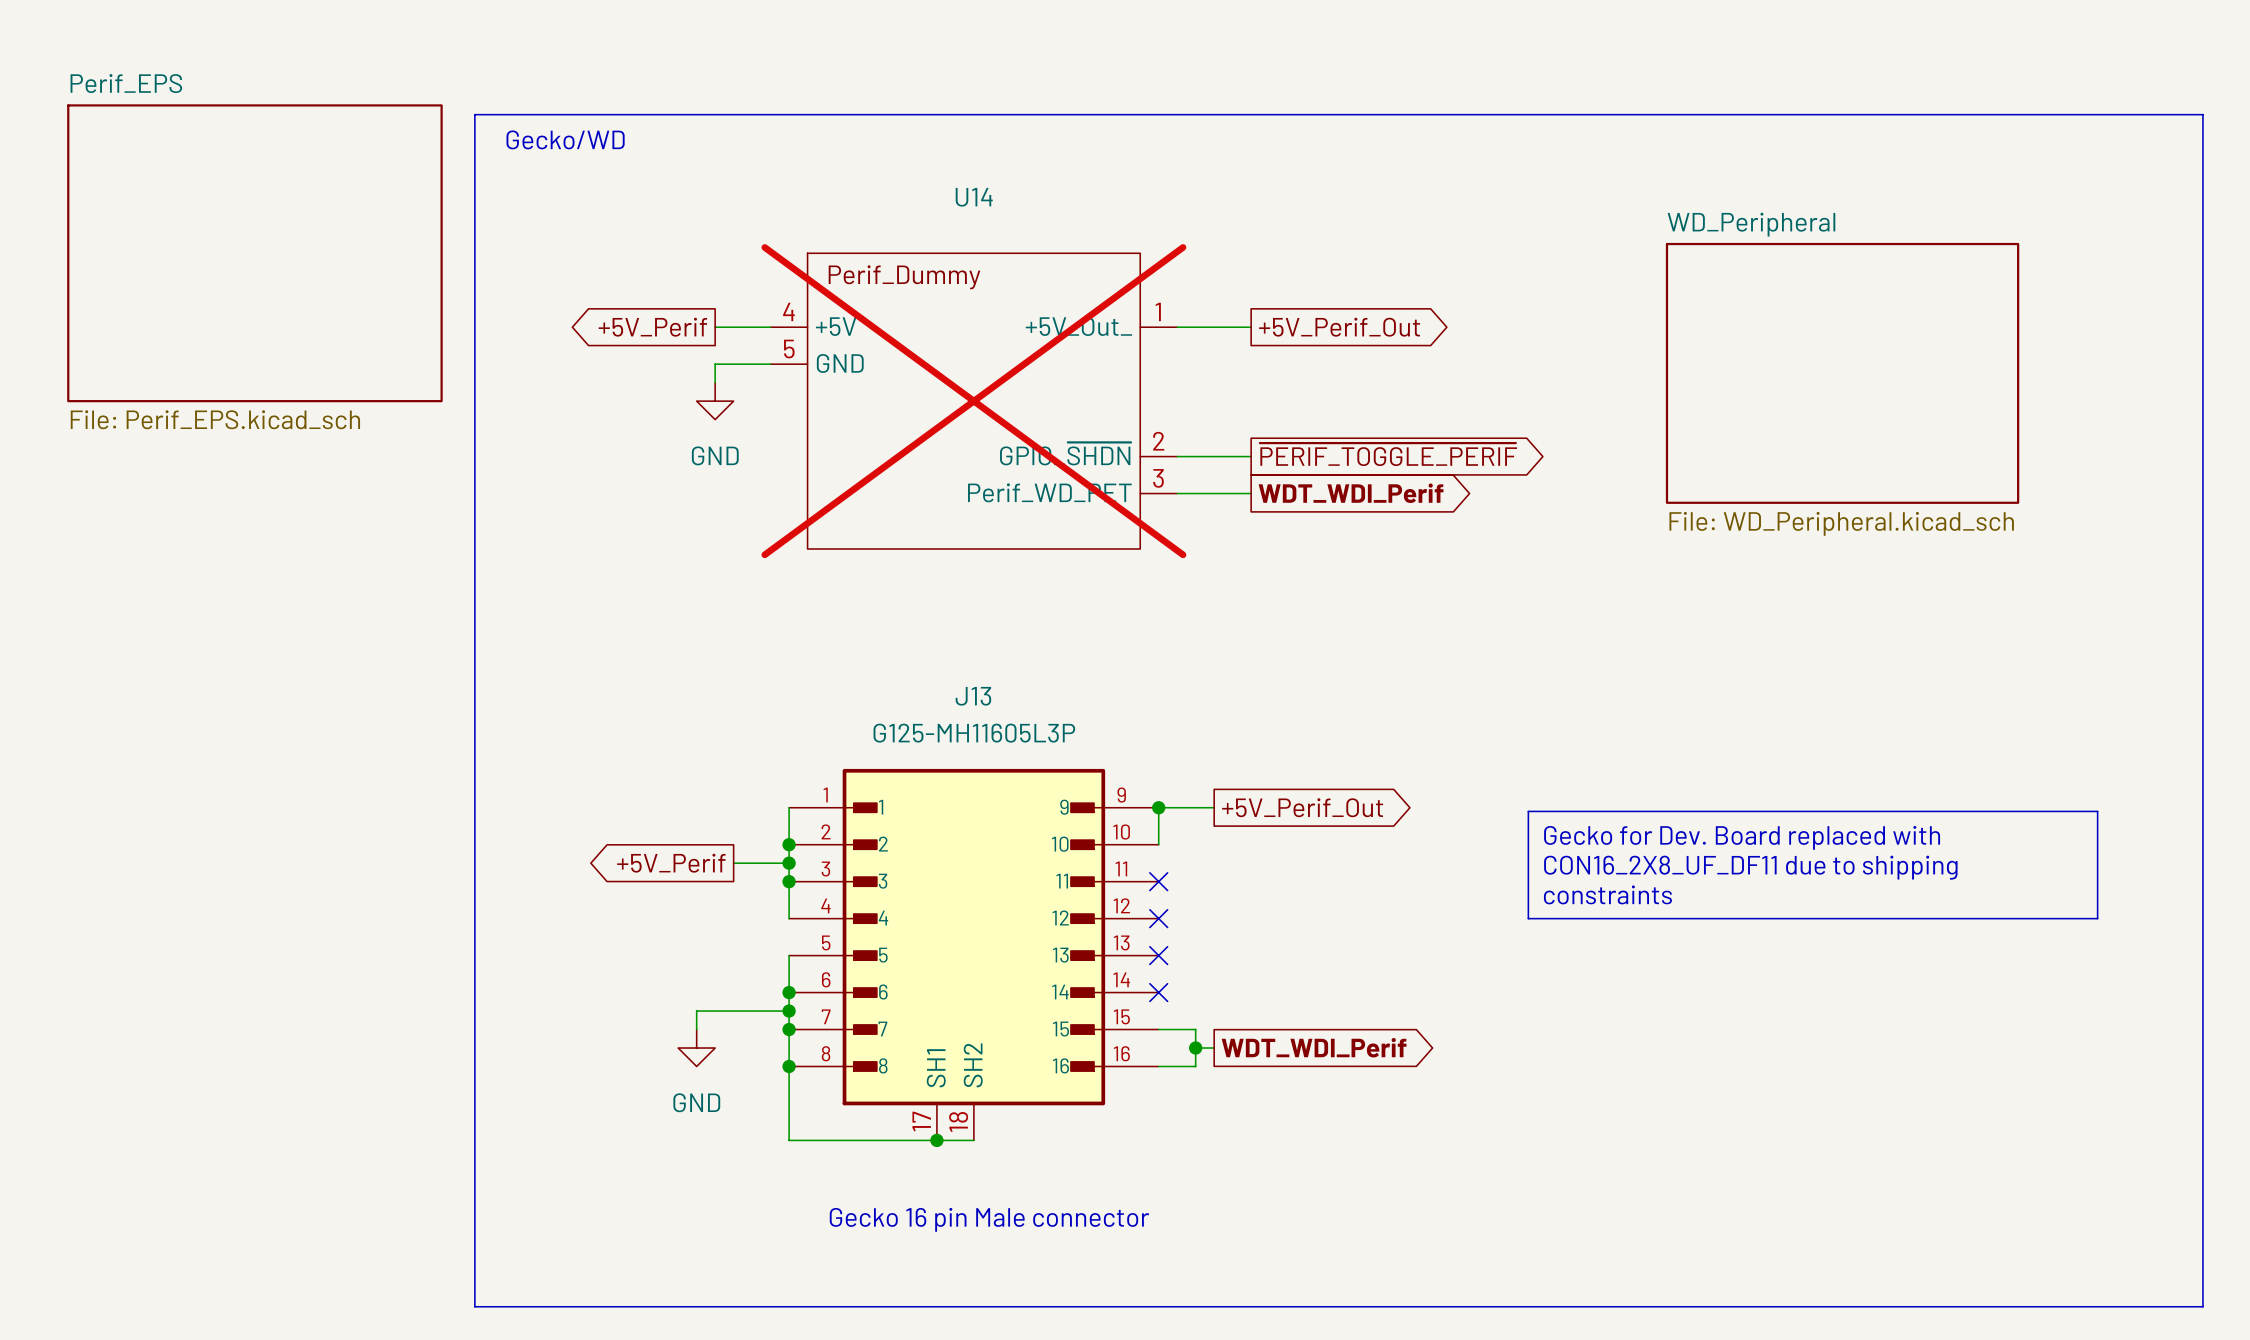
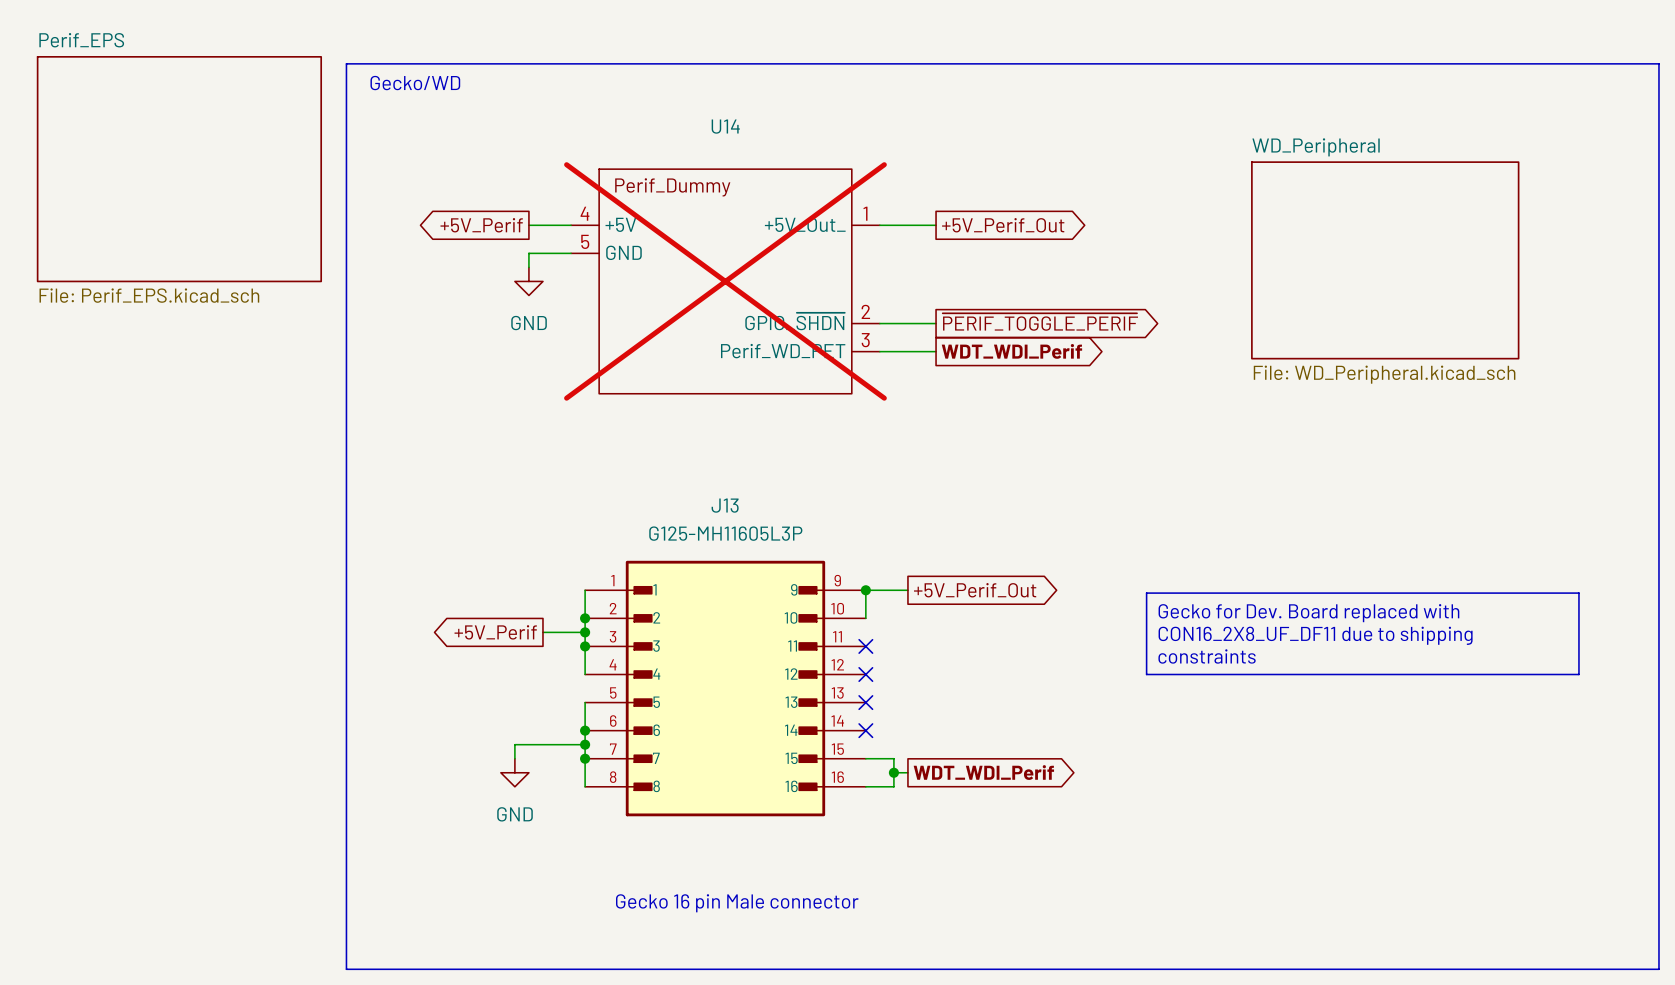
J13 symbol: [789, 768, 1159, 1141] -> [585, 560, 866, 817]
wire: (789, 1066) (789, 1140) (973, 1140) -> none
junction: (789, 1066) -> none
junction: (936, 1140) -> none

